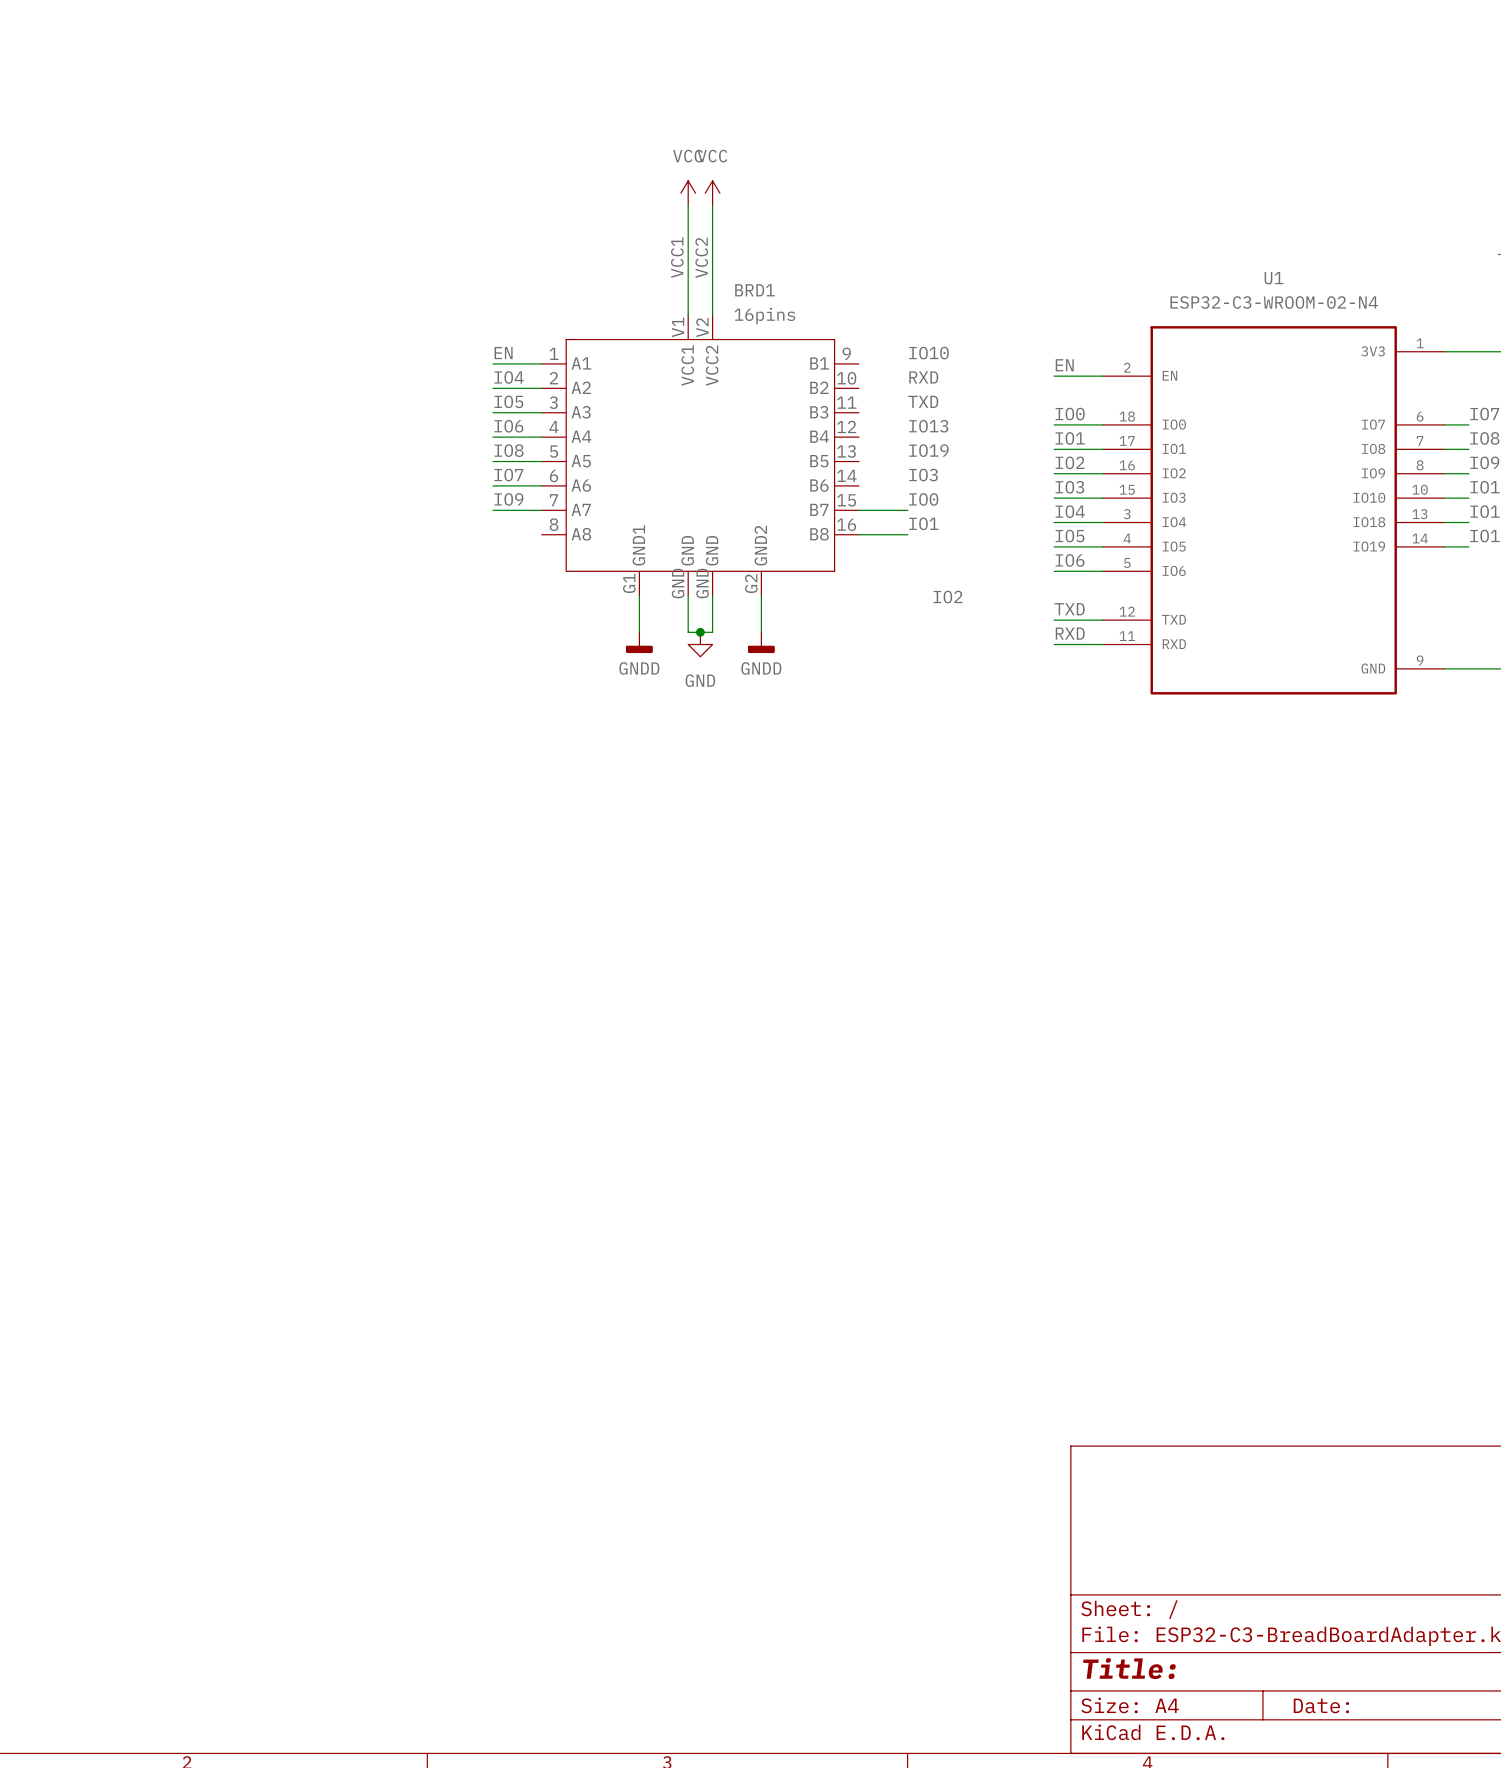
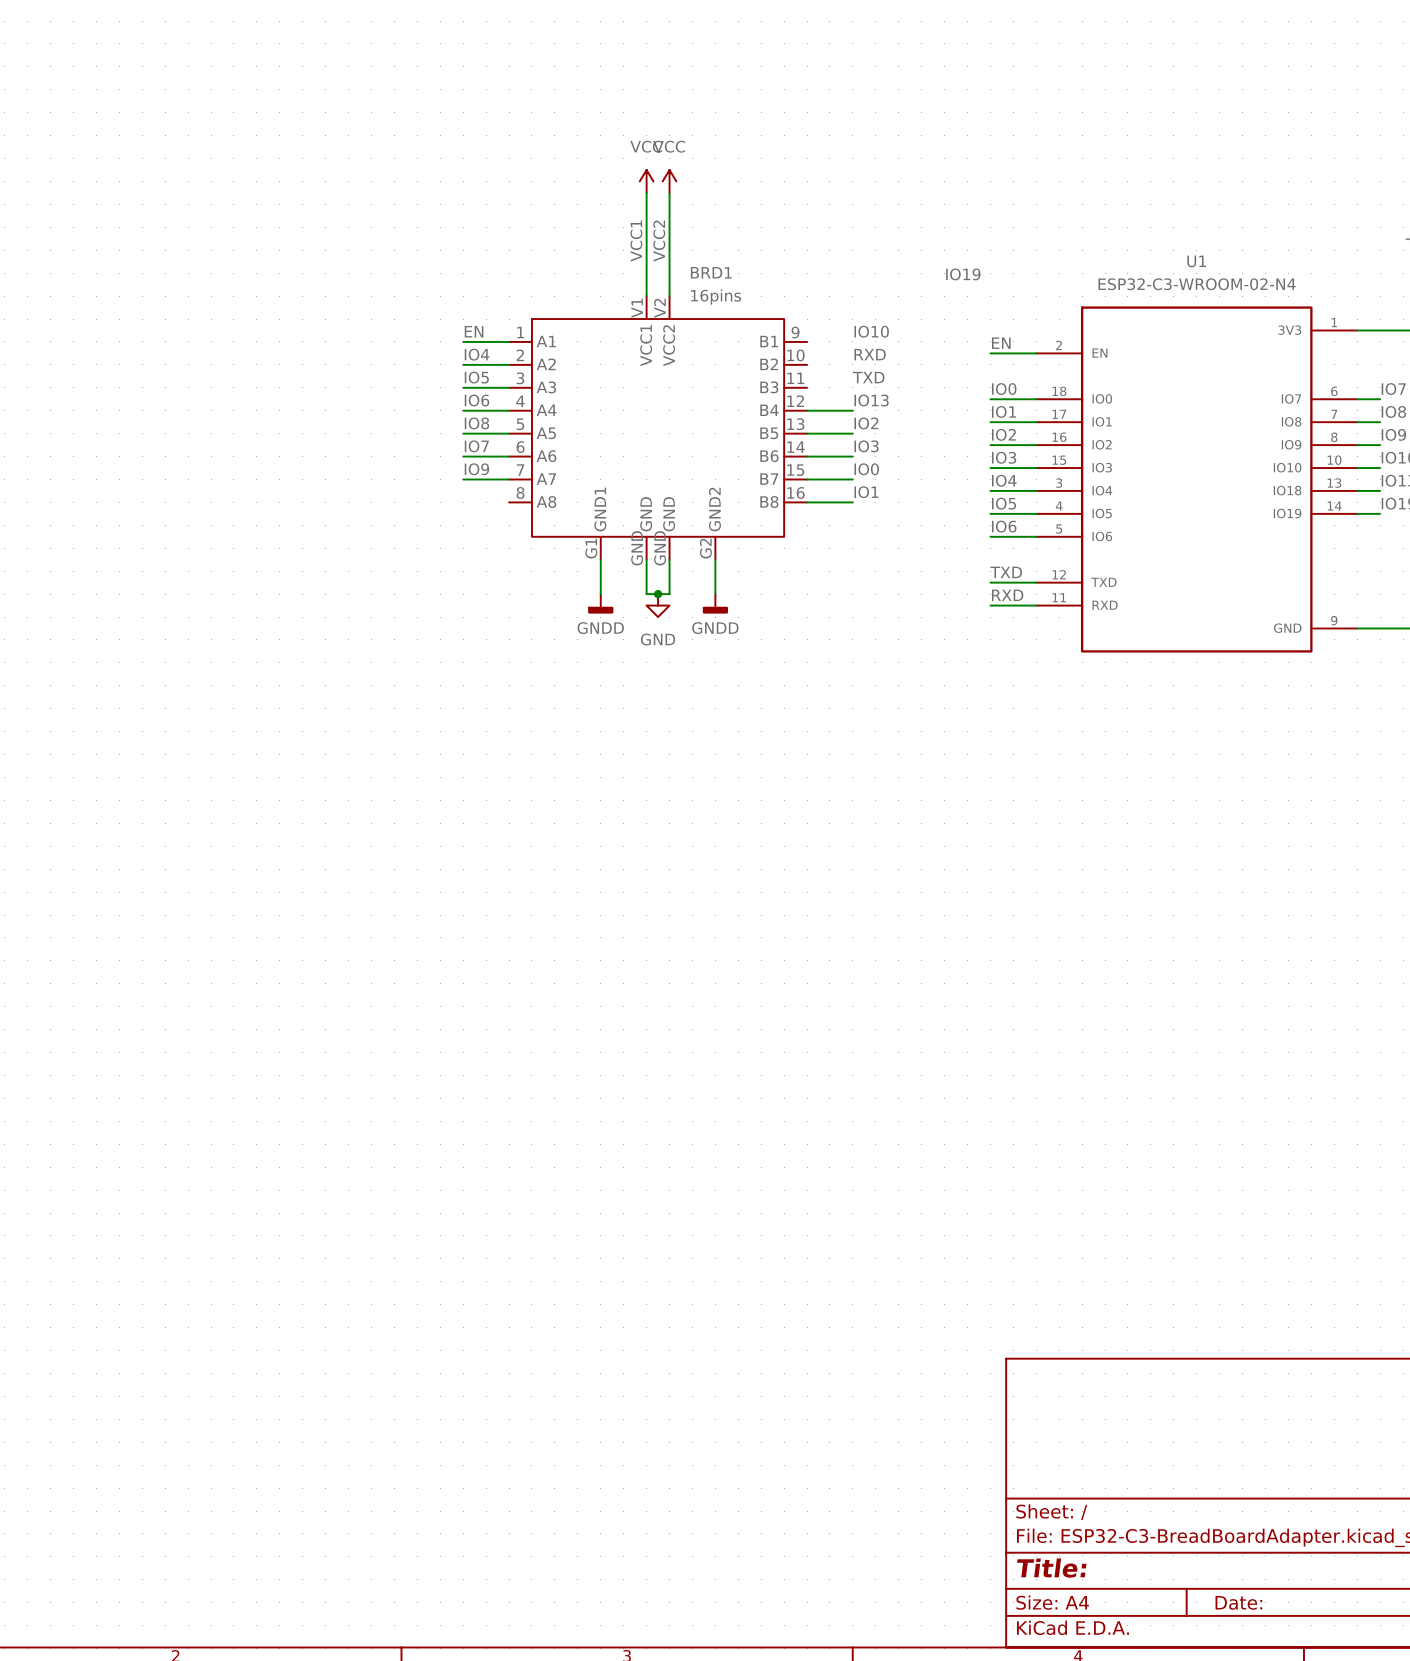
label: none -> IO19 (963, 274)
wire: none -> (807, 410) (852, 410)
label: IO19 (928, 450) -> IO2 (866, 423)
wire: none -> (807, 433) (852, 433)
wire: none -> (807, 456) (852, 456)
label: IO2 (948, 597) -> none

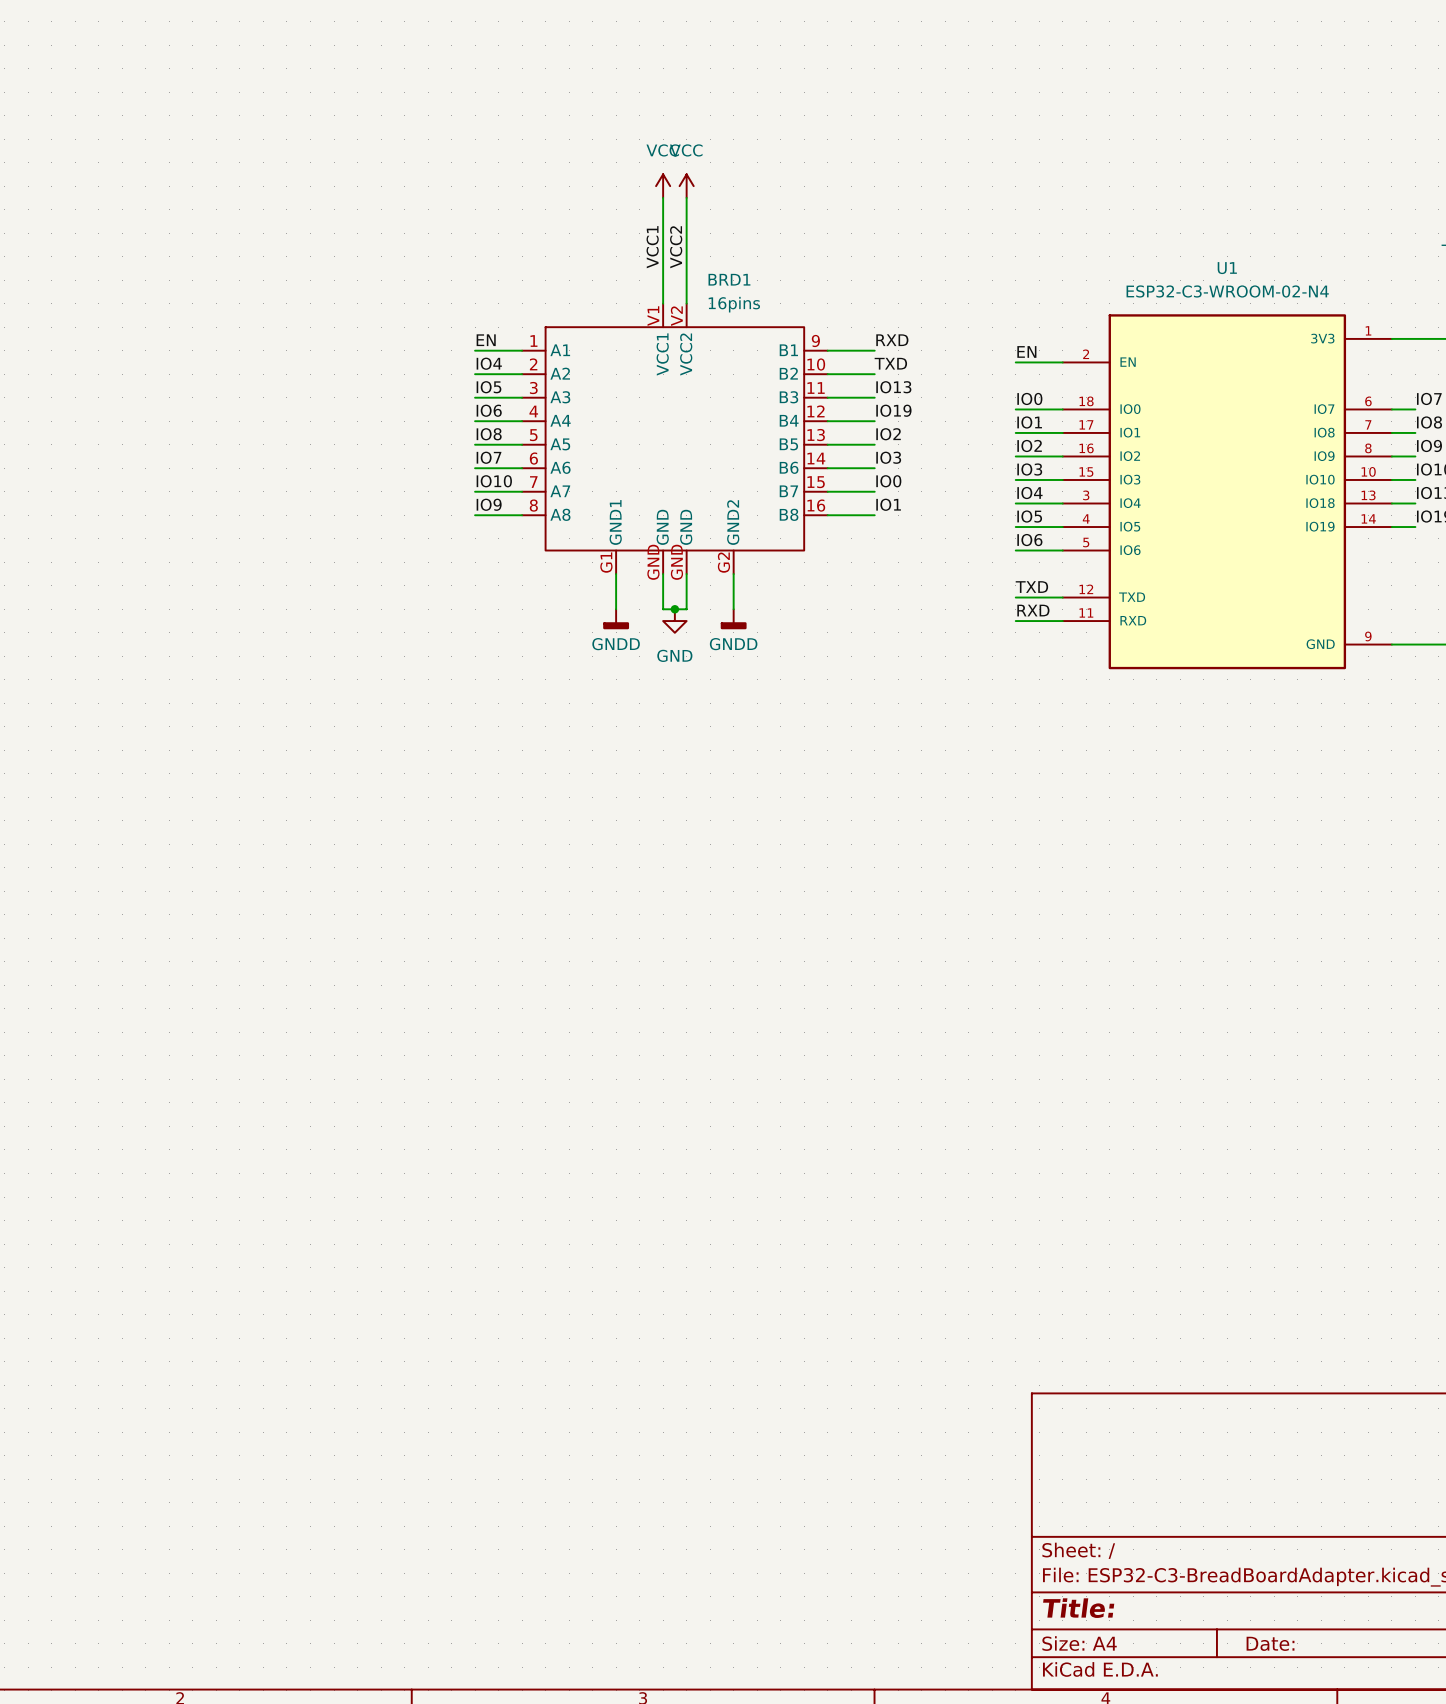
label: IO19 (963, 274) -> none
label: IO10 (871, 331) -> RXD (892, 340)
wire: none -> (827, 350) (874, 350)
label: RXD (870, 354) -> TXD (890, 363)
wire: none -> (827, 374) (874, 374)
label: TXD (868, 377) -> IO13 (893, 387)
wire: none -> (827, 397) (874, 397)
label: IO13 (871, 400) -> IO19 (893, 410)
label: IO9 (476, 469) -> IO10 (494, 481)
label: none -> IO9 (489, 504)
wire: none -> (475, 515) (522, 515)

